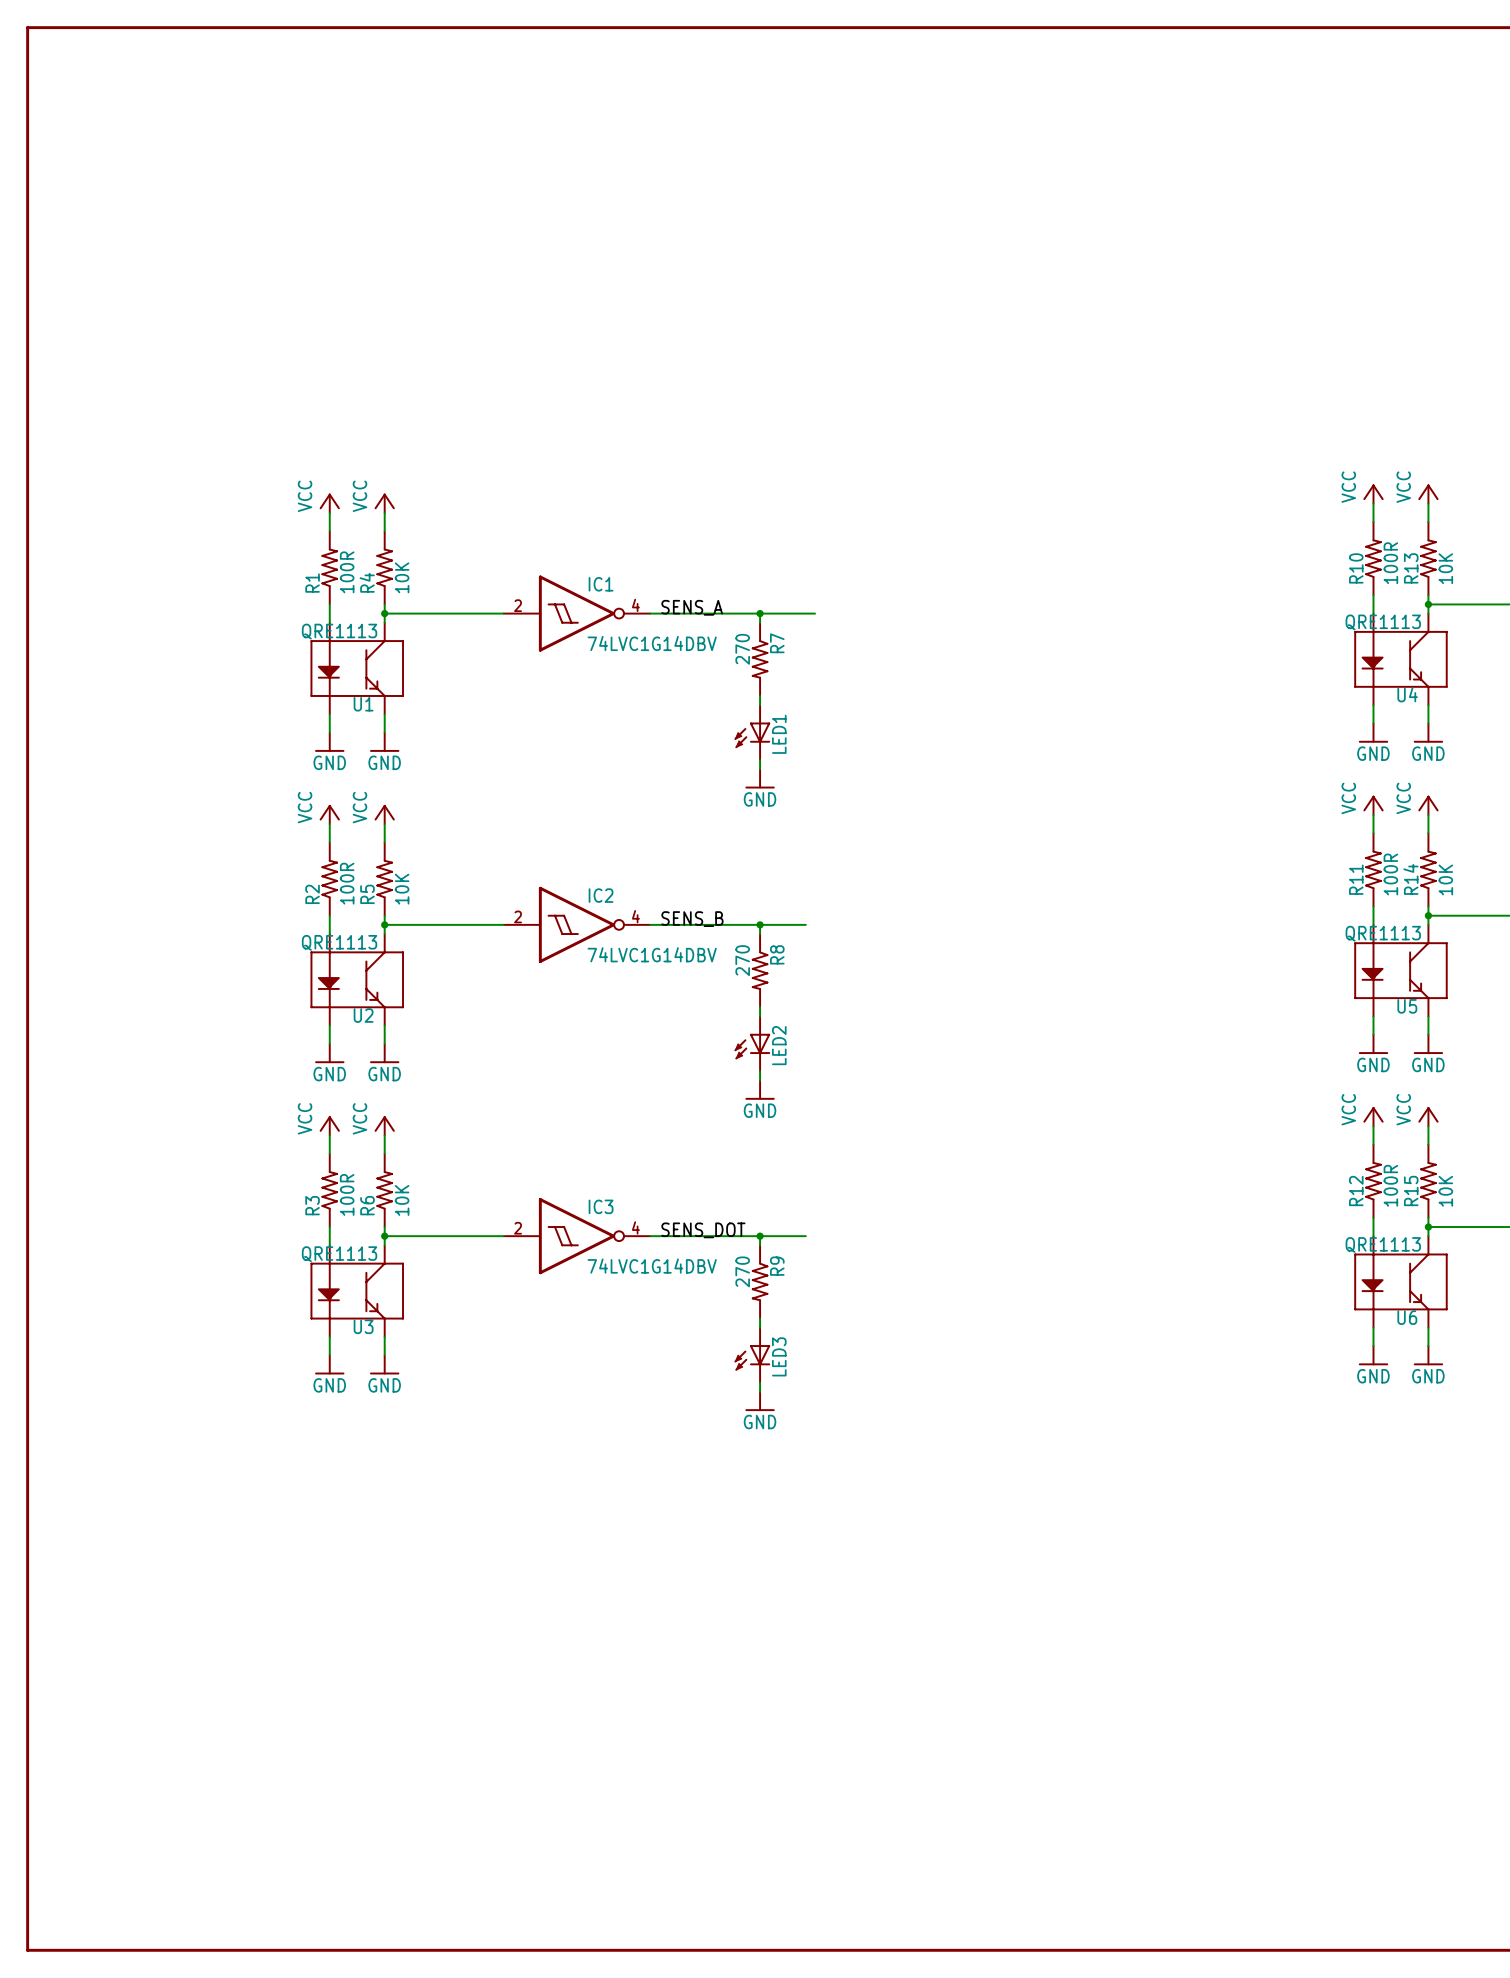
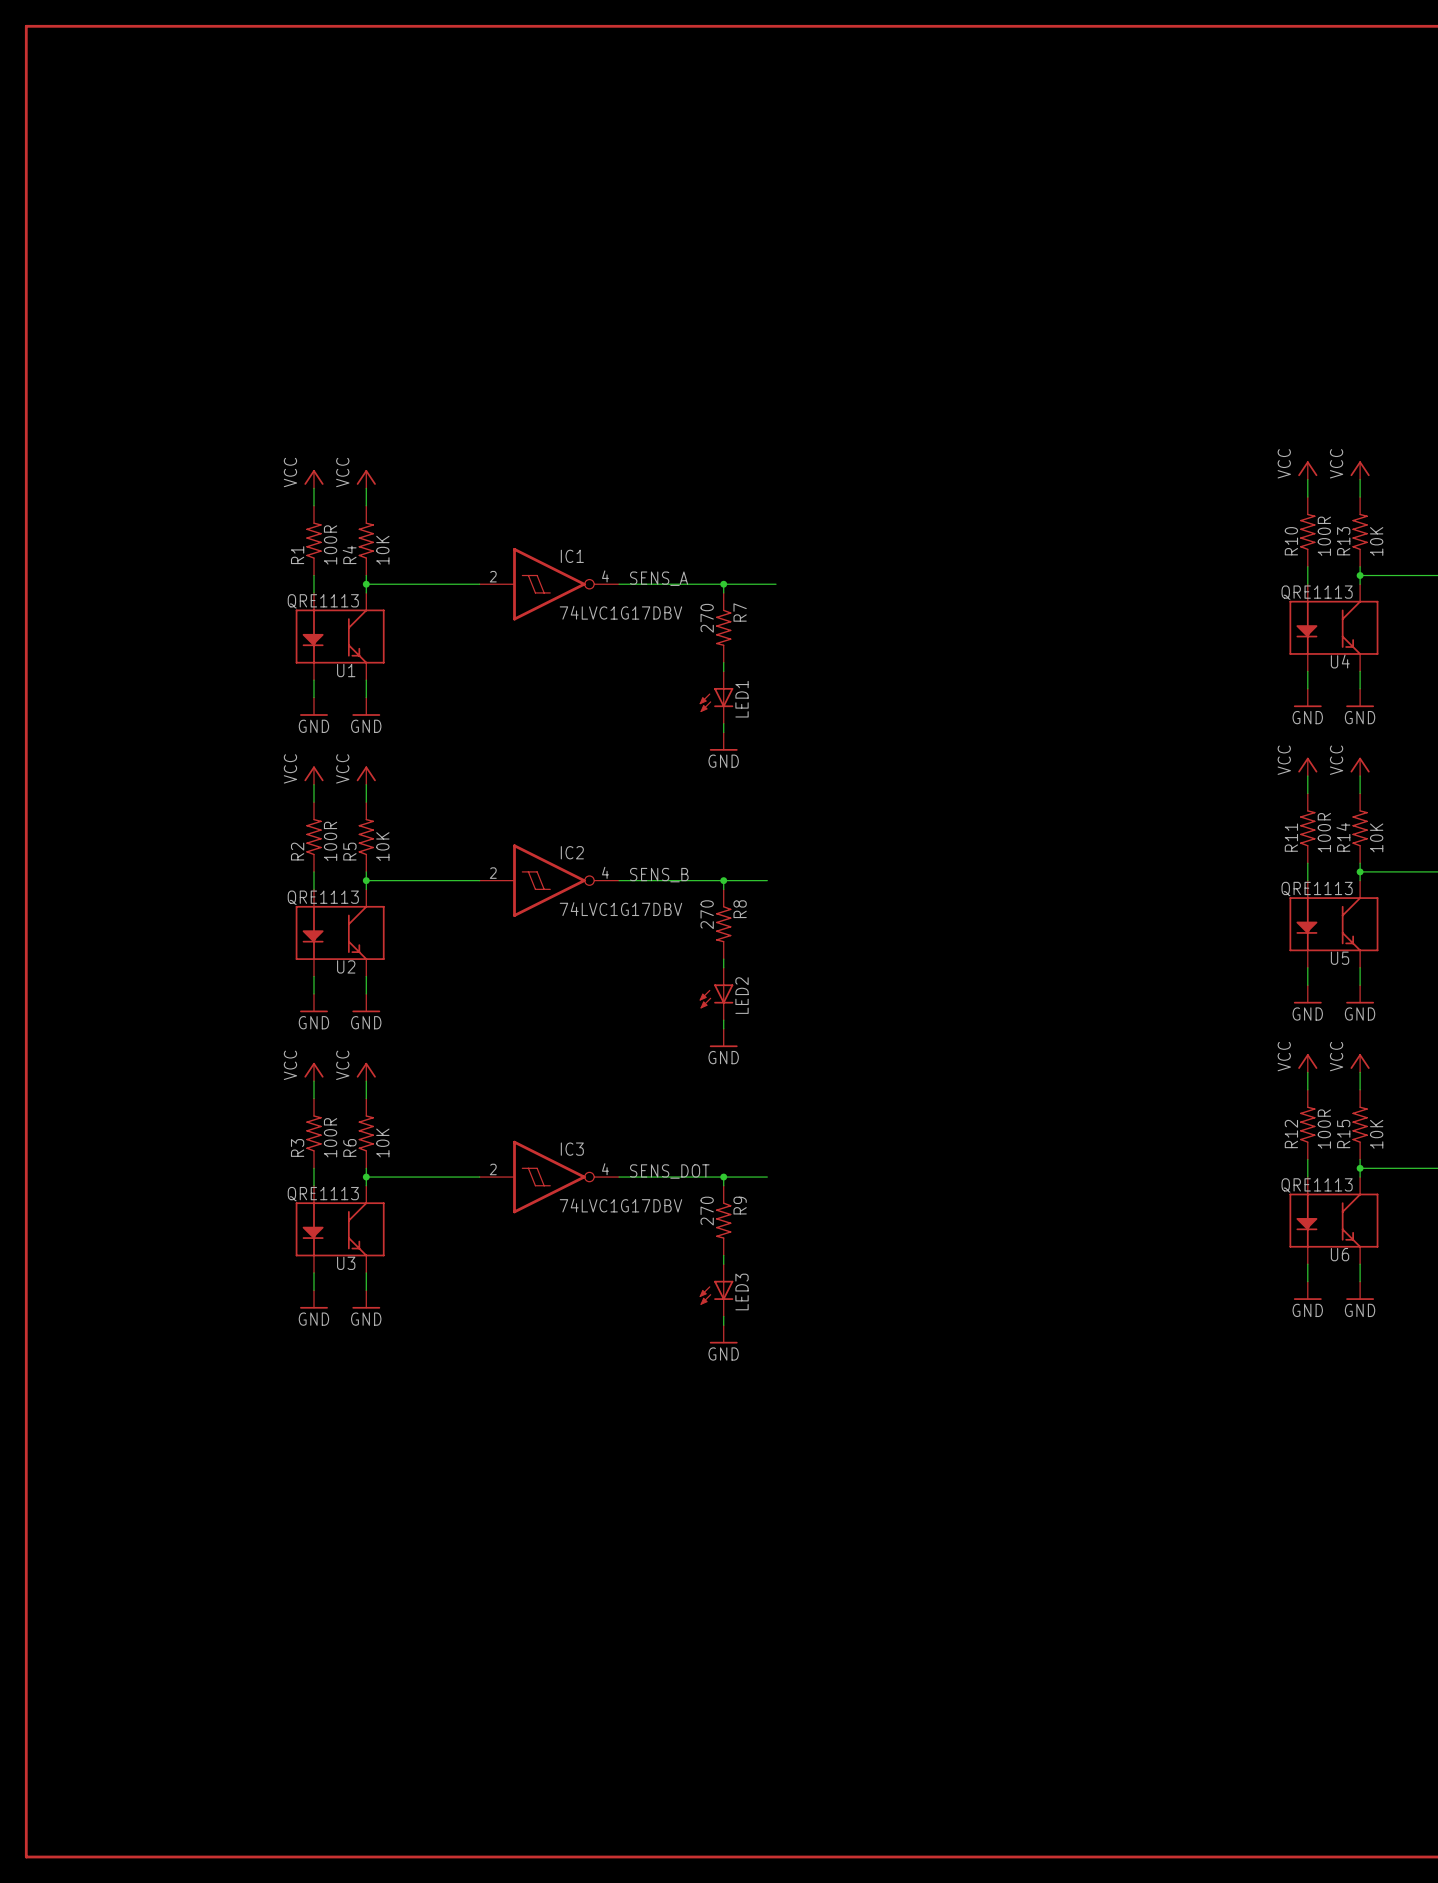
IC1 value: 74LVC1G14DBV (652, 643) -> 74LVC1G17DBV (620, 612)
IC2 value: 74LVC1G14DBV (652, 954) -> 74LVC1G17DBV (620, 909)
IC3 value: 74LVC1G14DBV (652, 1266) -> 74LVC1G17DBV (620, 1205)

